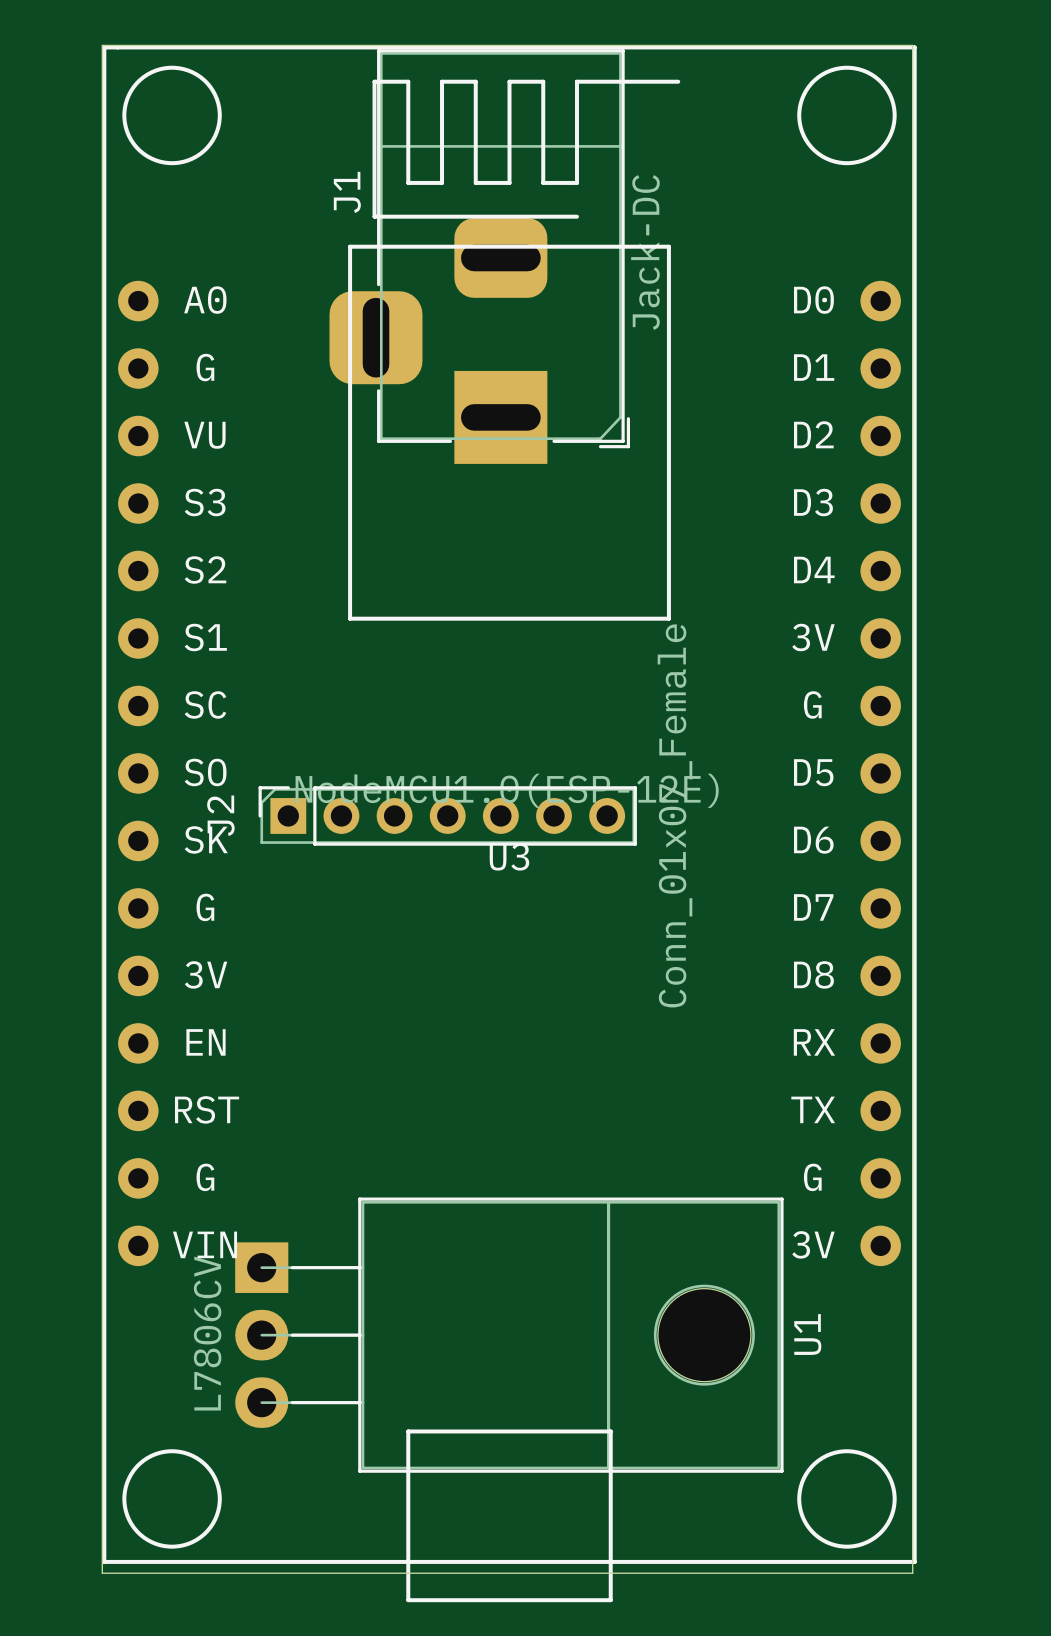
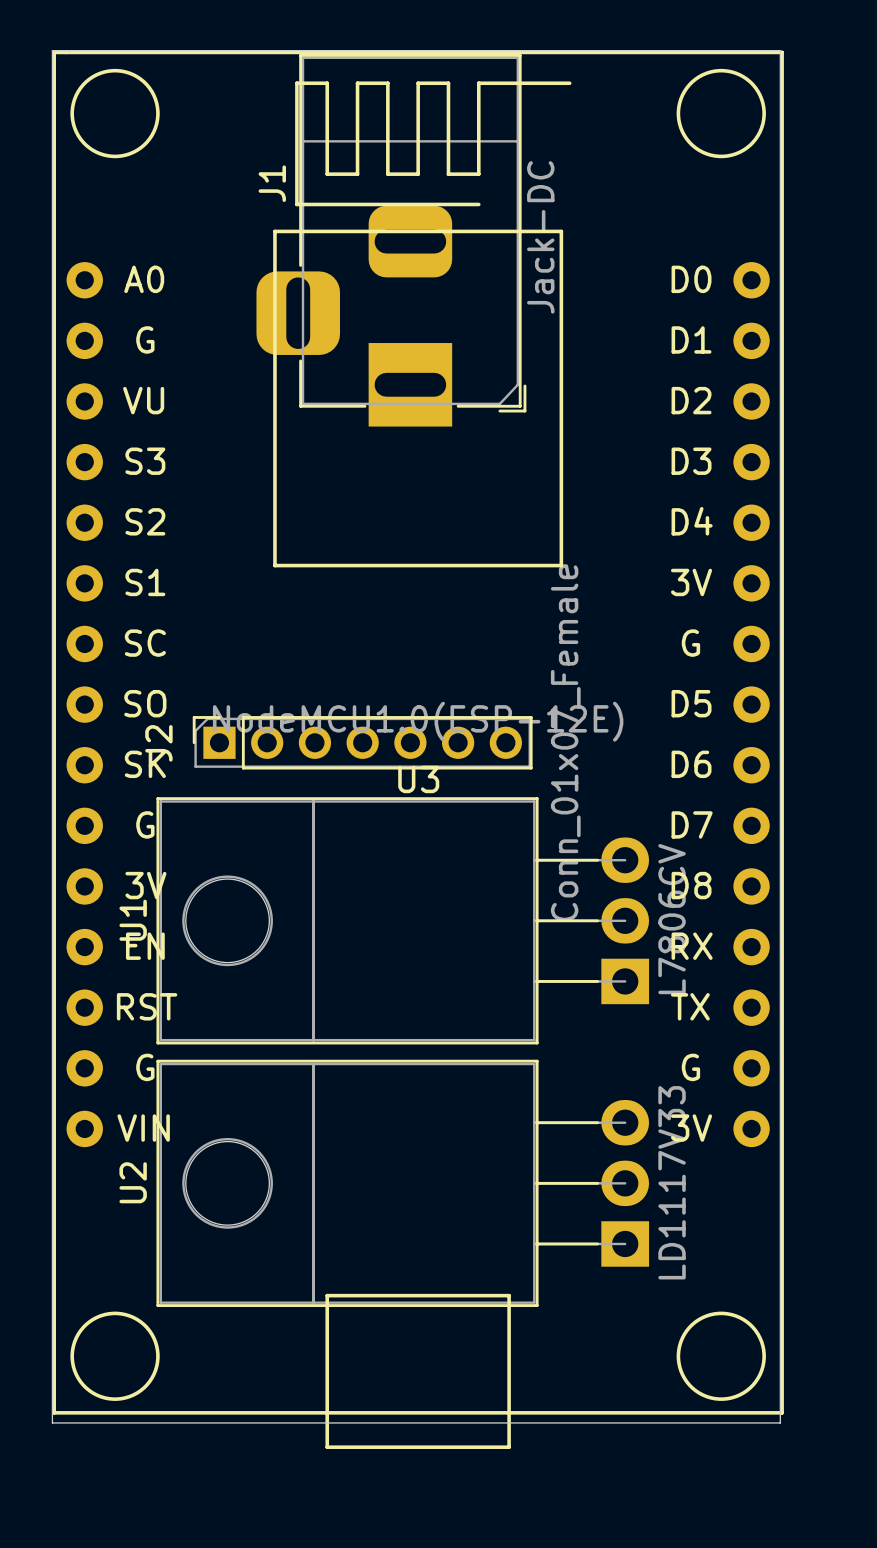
U2: none -> LD1117V33 (402, 1183)
U1 rotation: 0° (509, 1335) -> 180° (402, 920)

